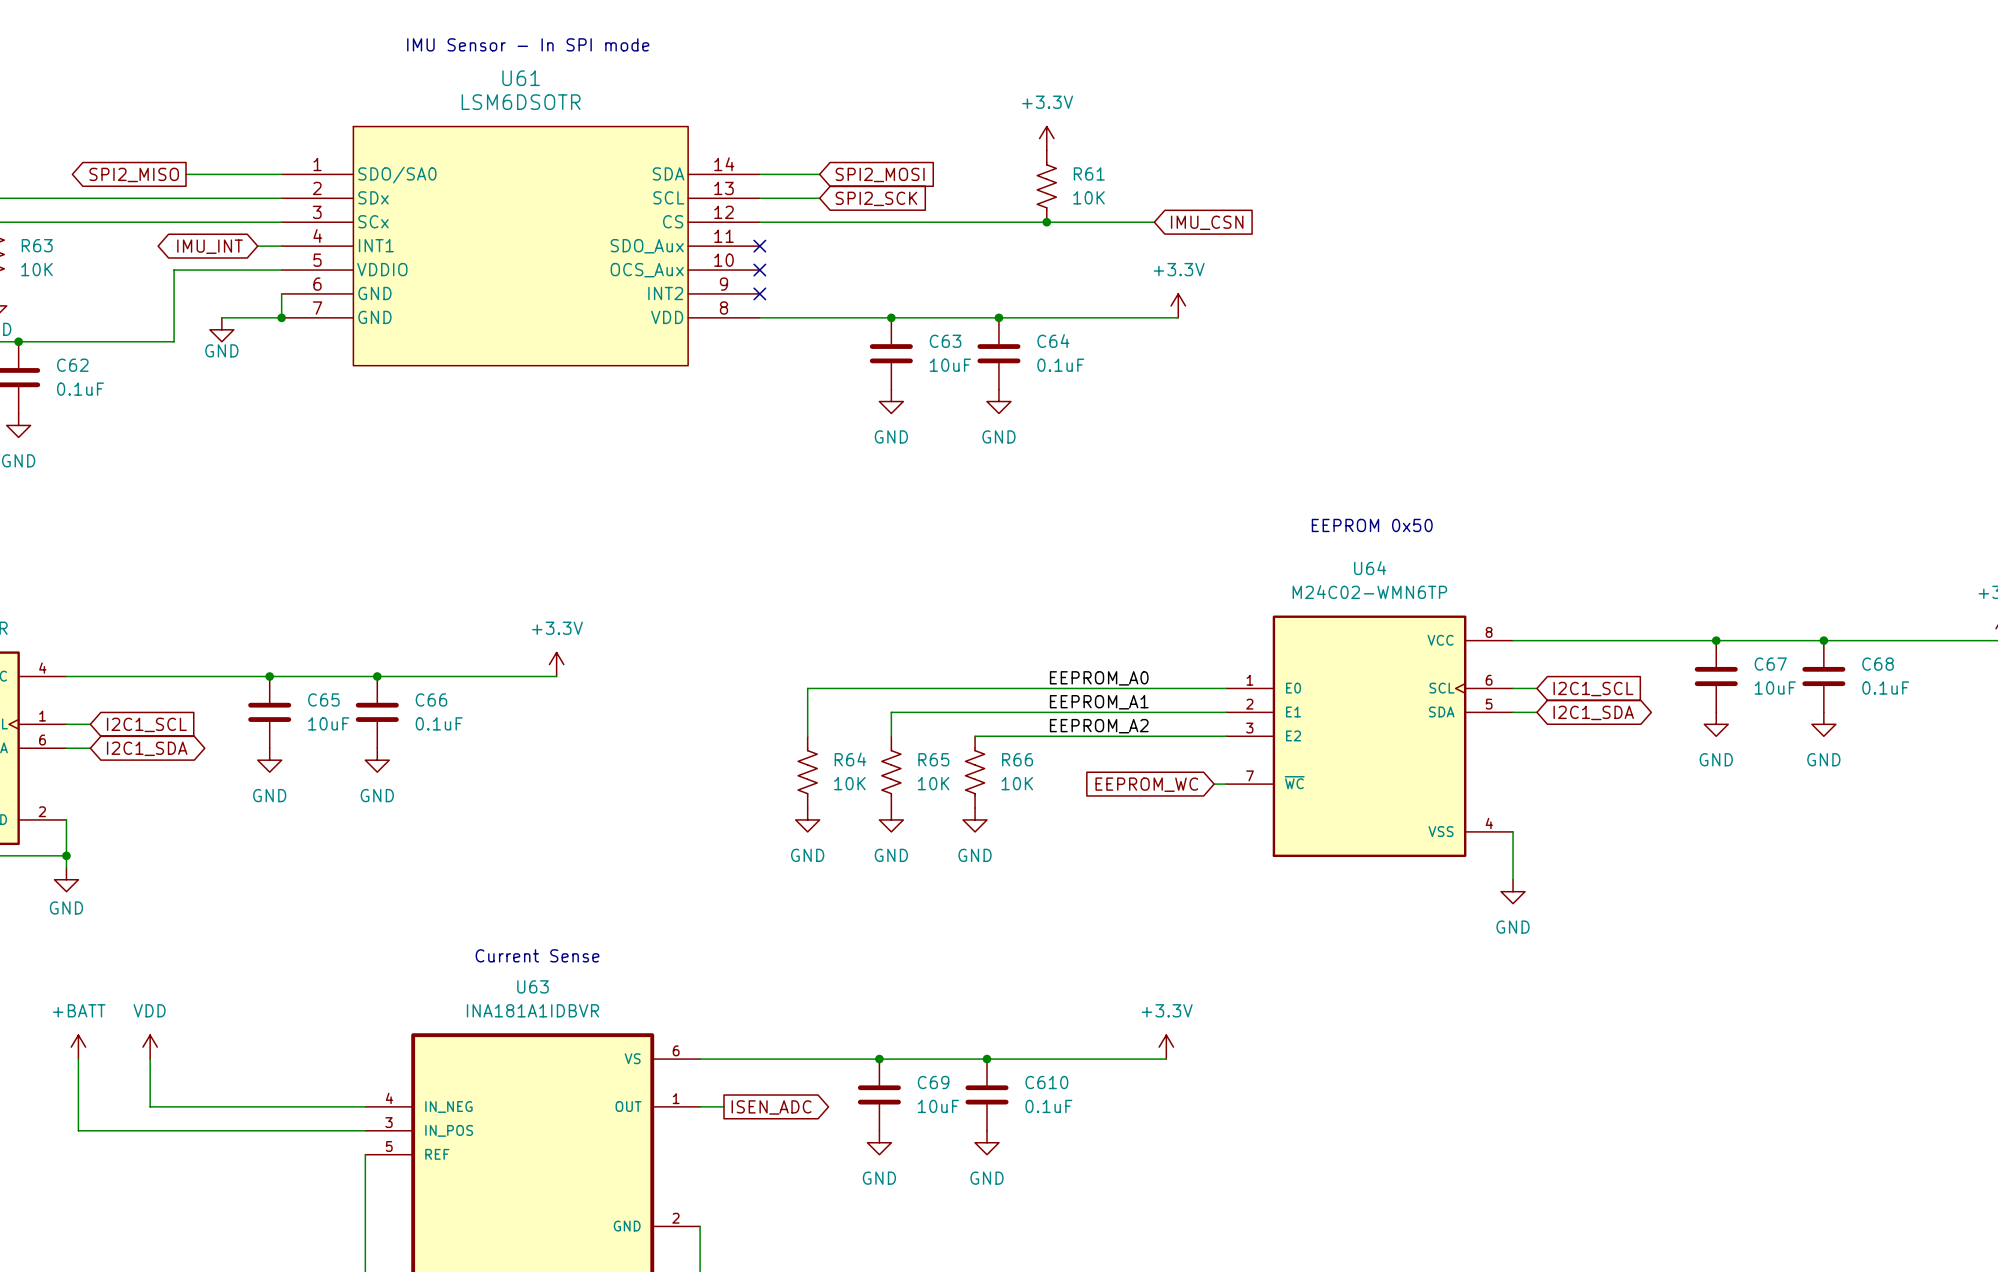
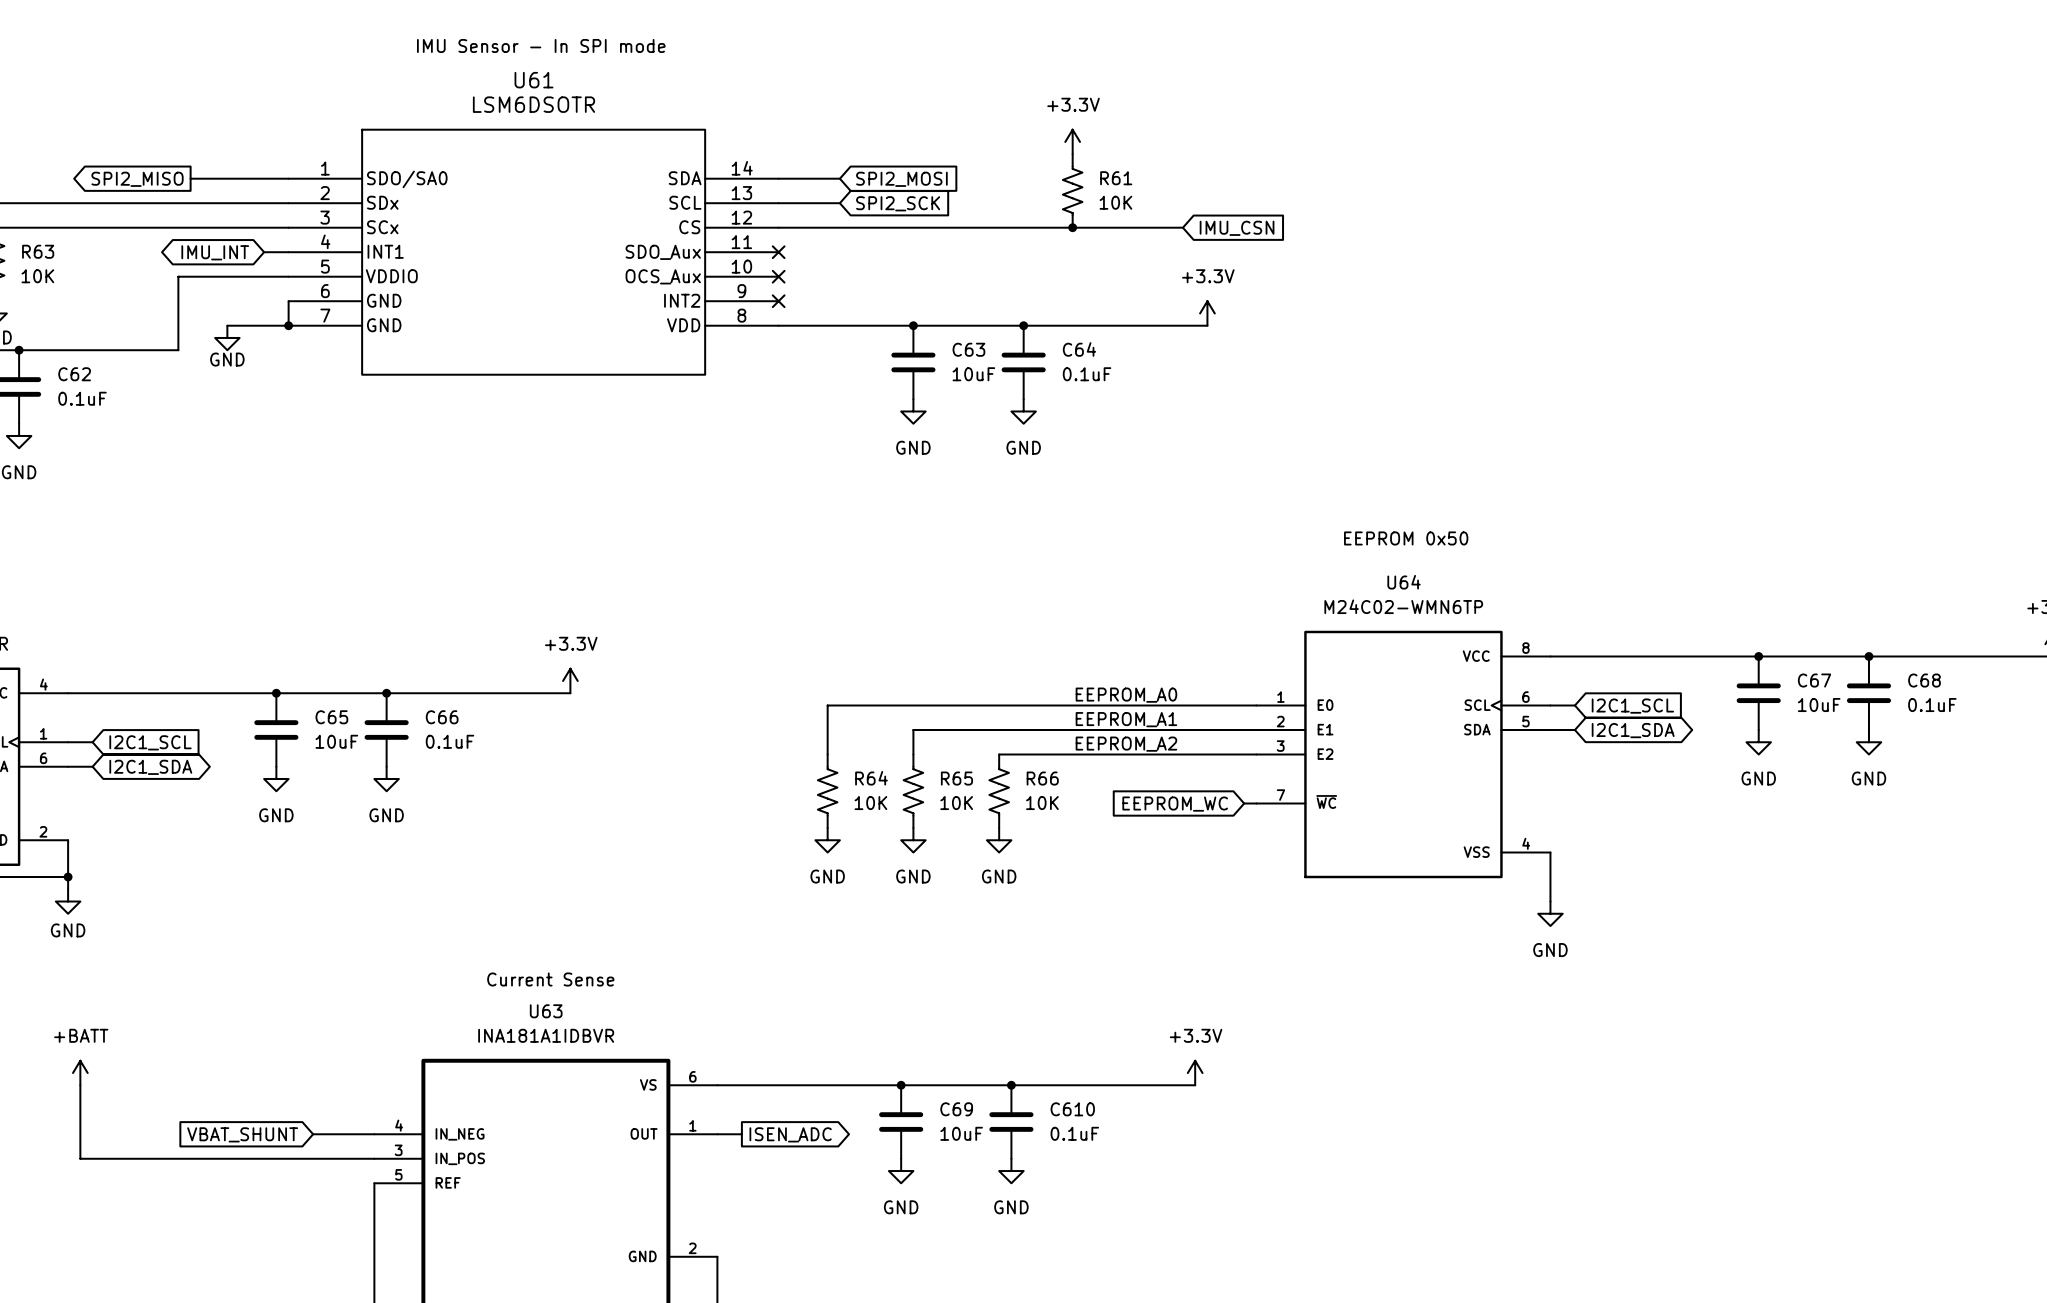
power symbol: VDD (150, 1047) -> none
wire: (150, 1059) (150, 1106) (305, 1106) -> none
global label: none -> VBAT_SHUNT (242, 1134)

